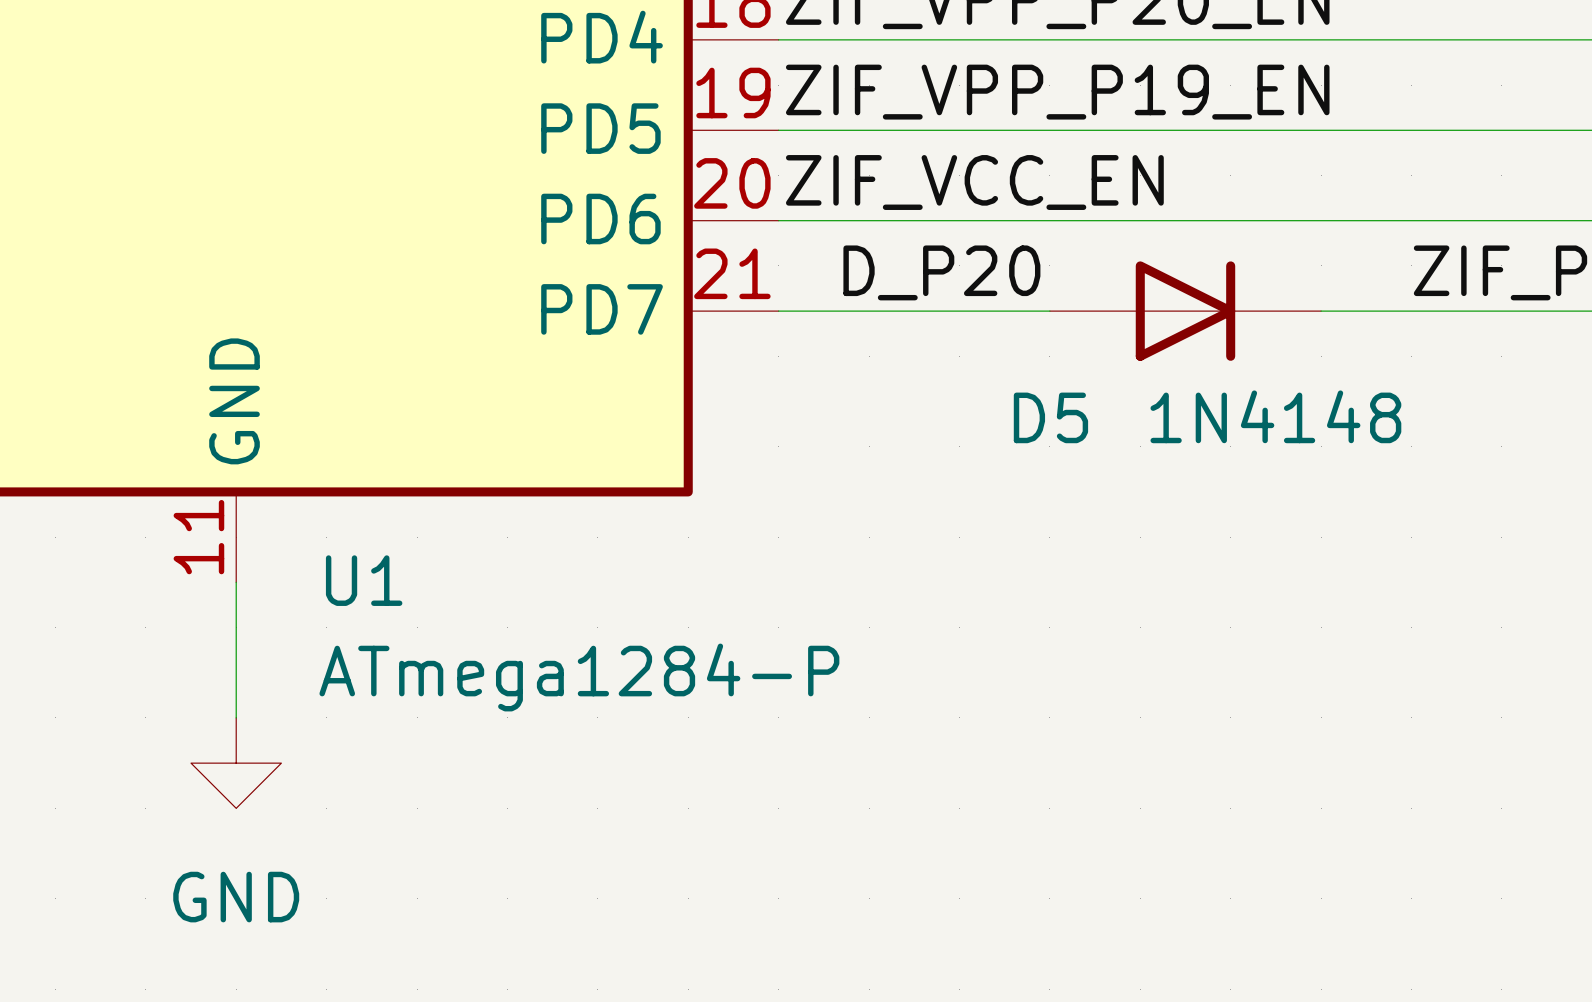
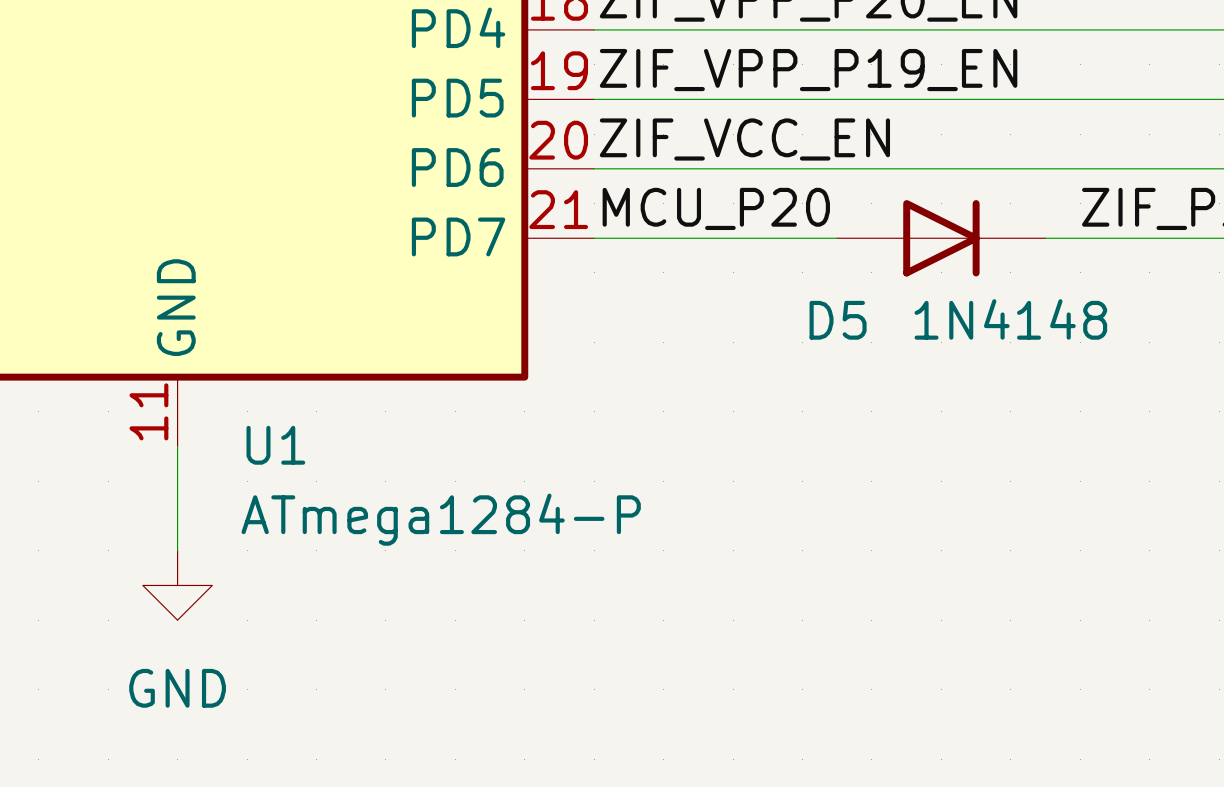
label: D_P20 (941, 272) -> MCU_P20 (716, 208)
D5 position: (1185, 311) -> (941, 238)

